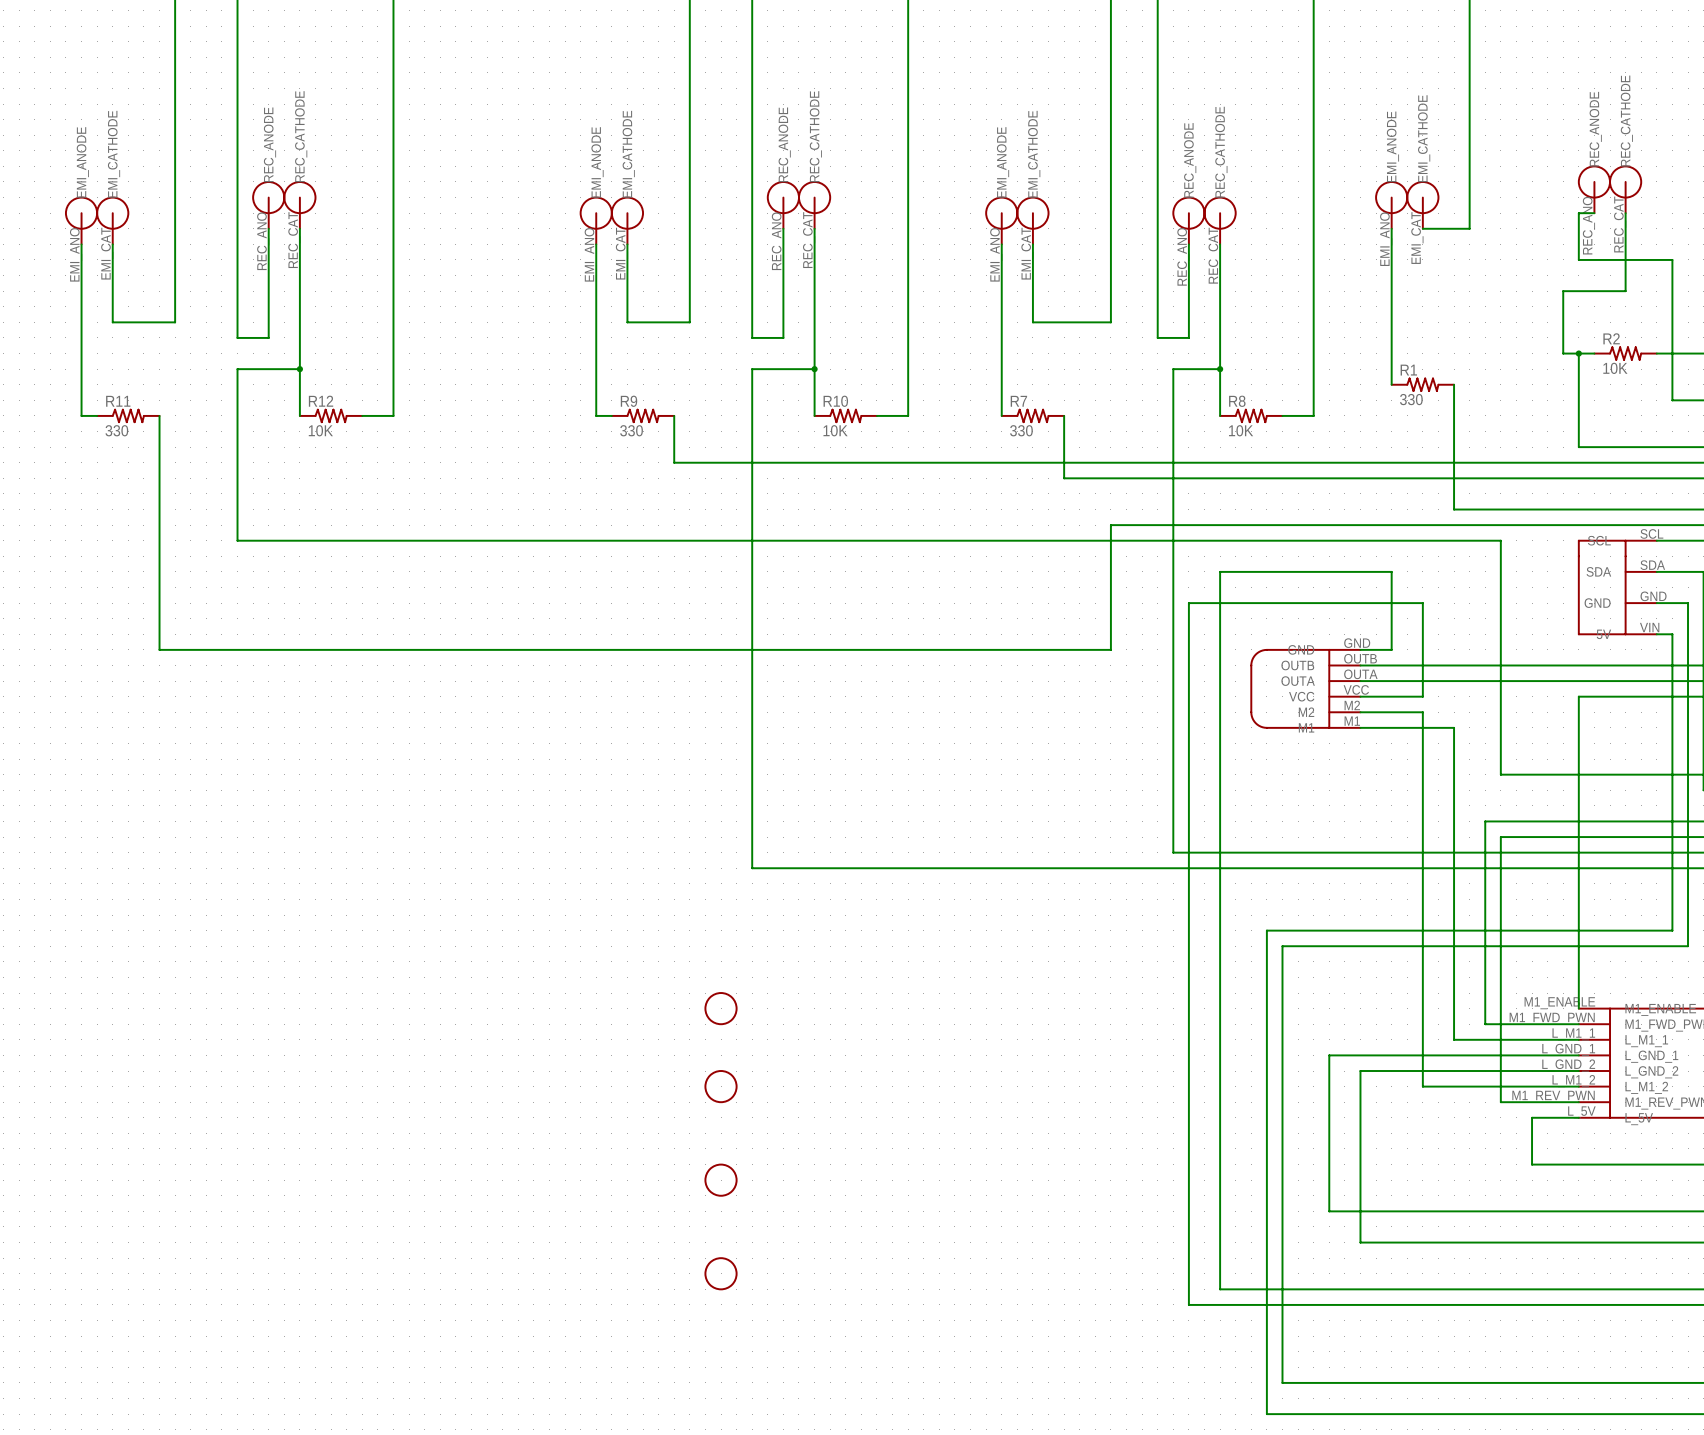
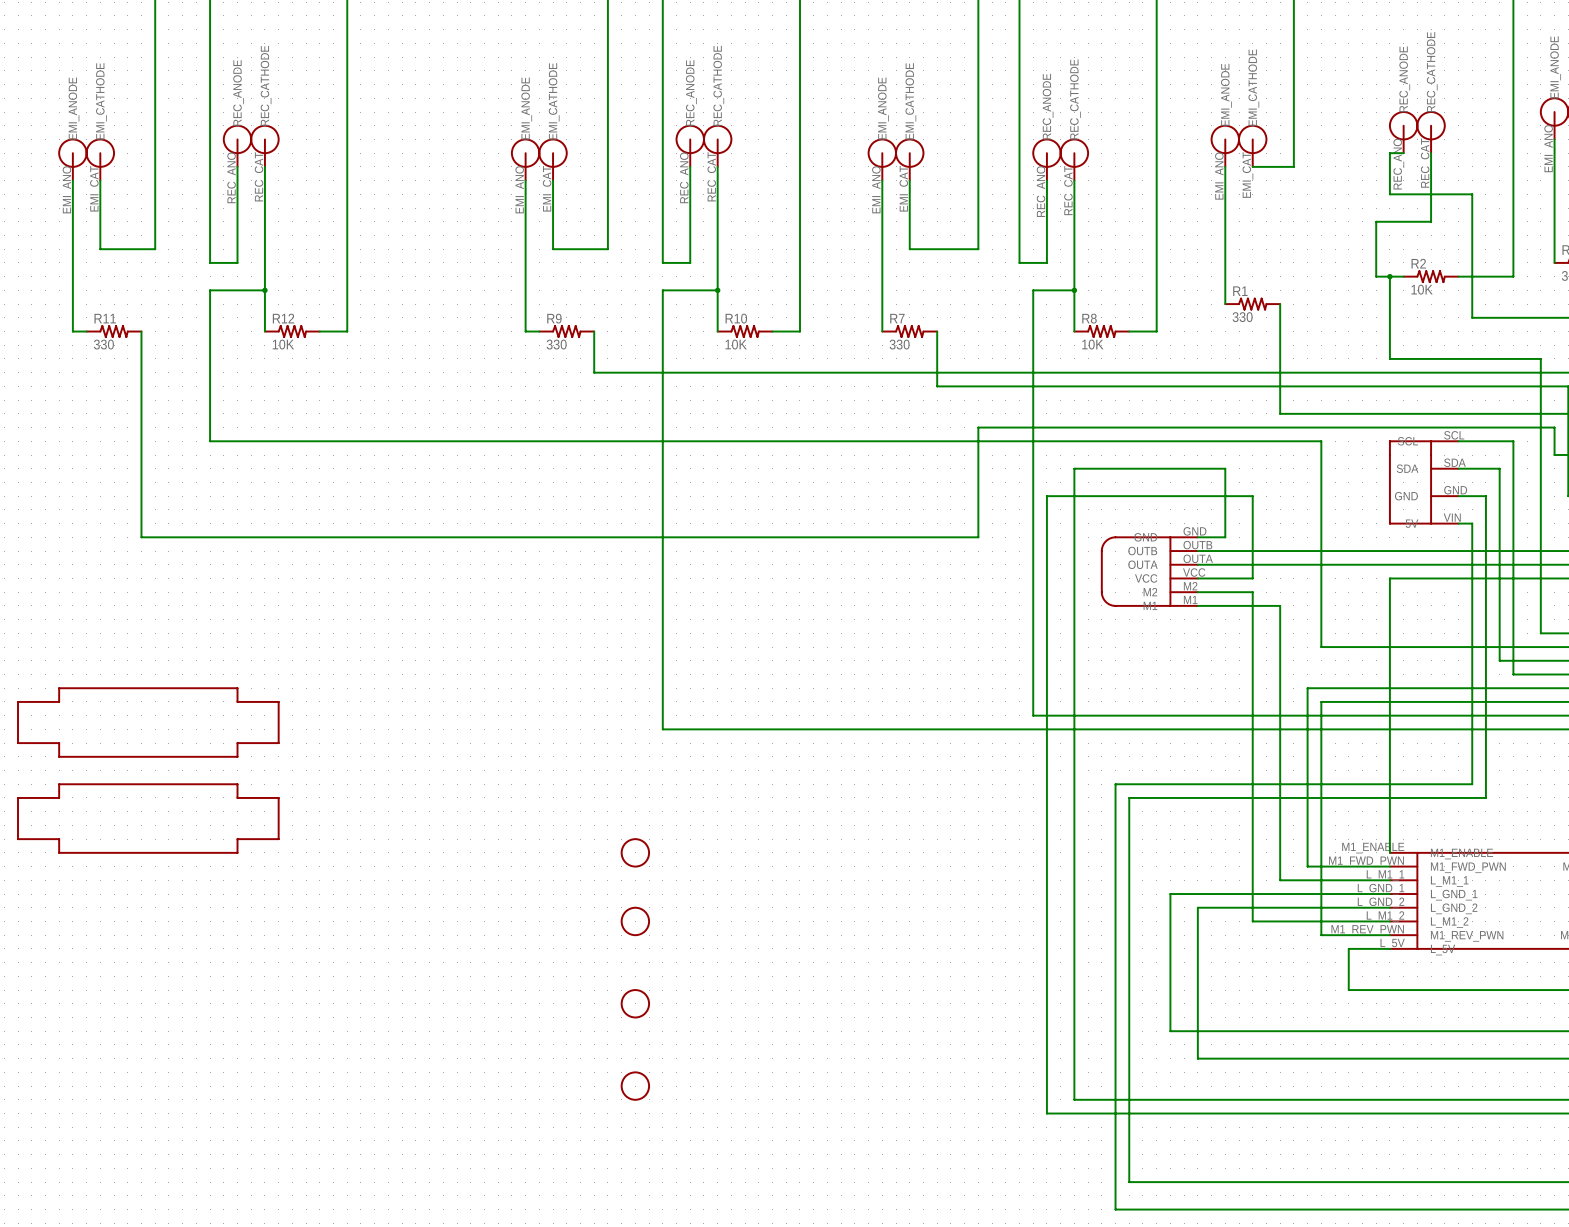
part: none -> (148, 722)
part: none -> (148, 818)

